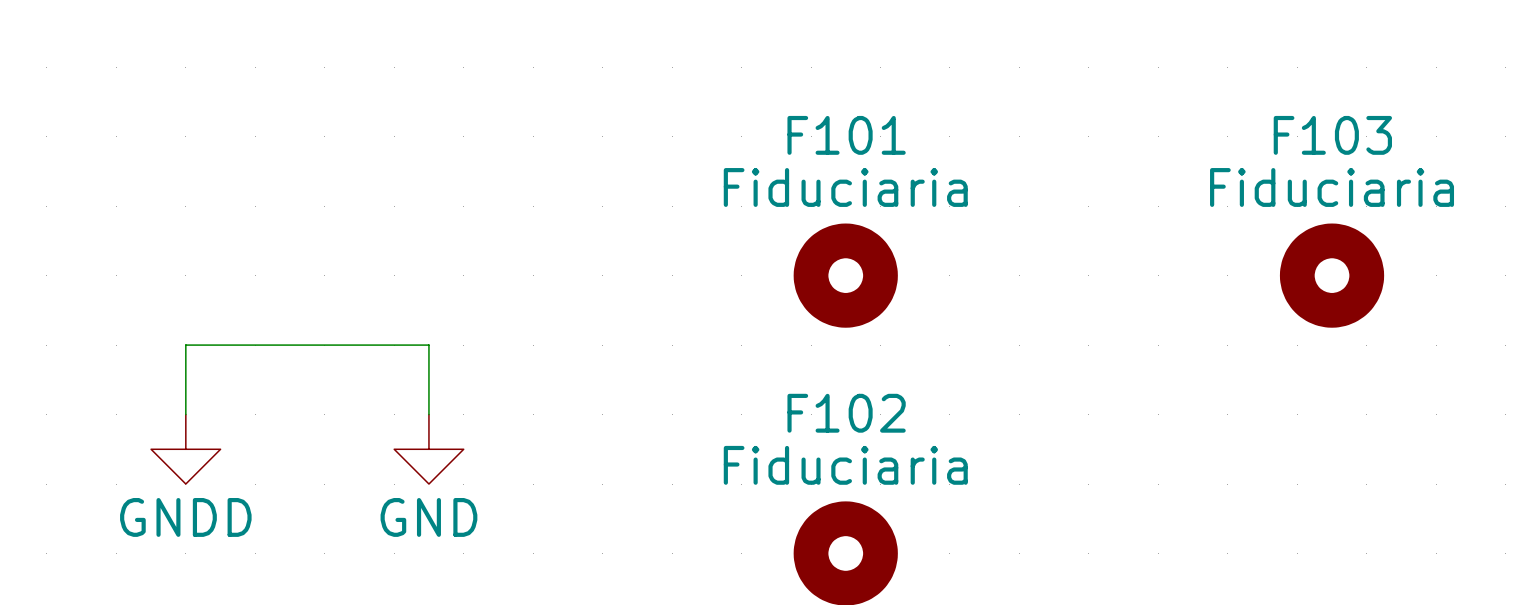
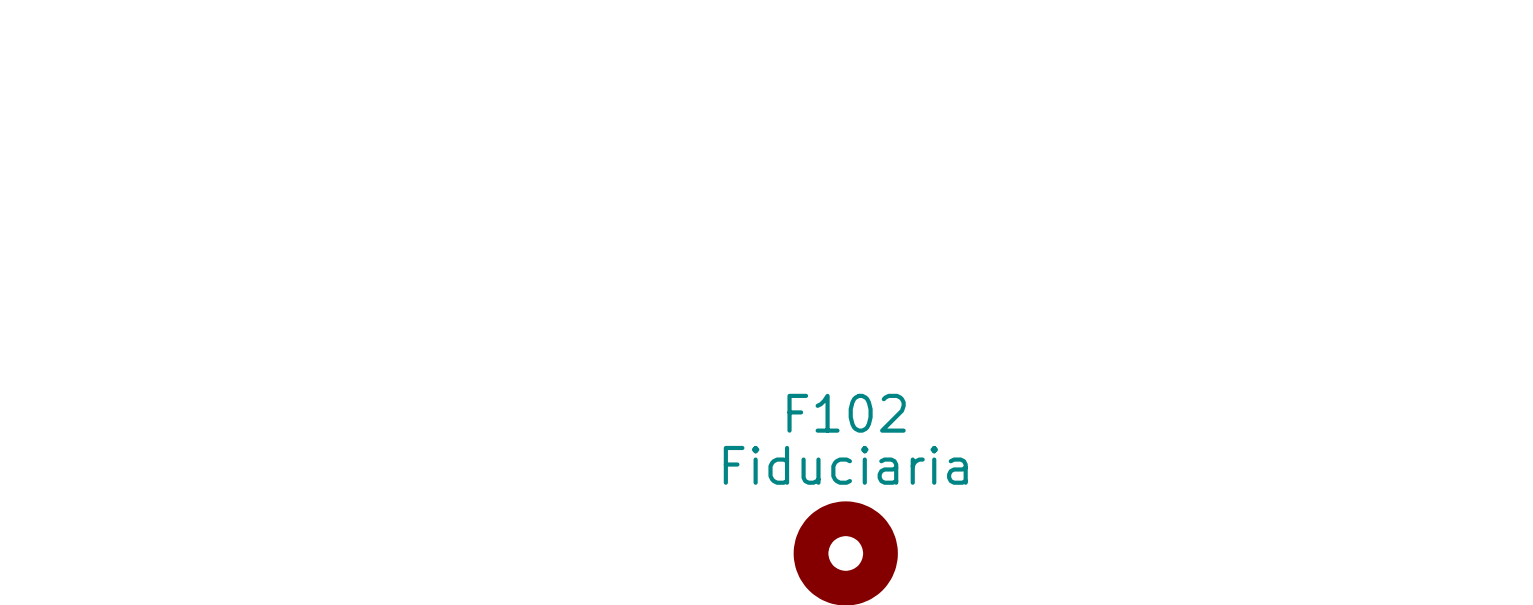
F101: Fiduciaria (845, 275) -> none
F103: Fiduciaria (1332, 275) -> none
wire: (185, 414) (185, 345) (428, 345) (428, 414) -> none
power symbol: GNDD (185, 449) -> none
power symbol: GND (428, 449) -> none

